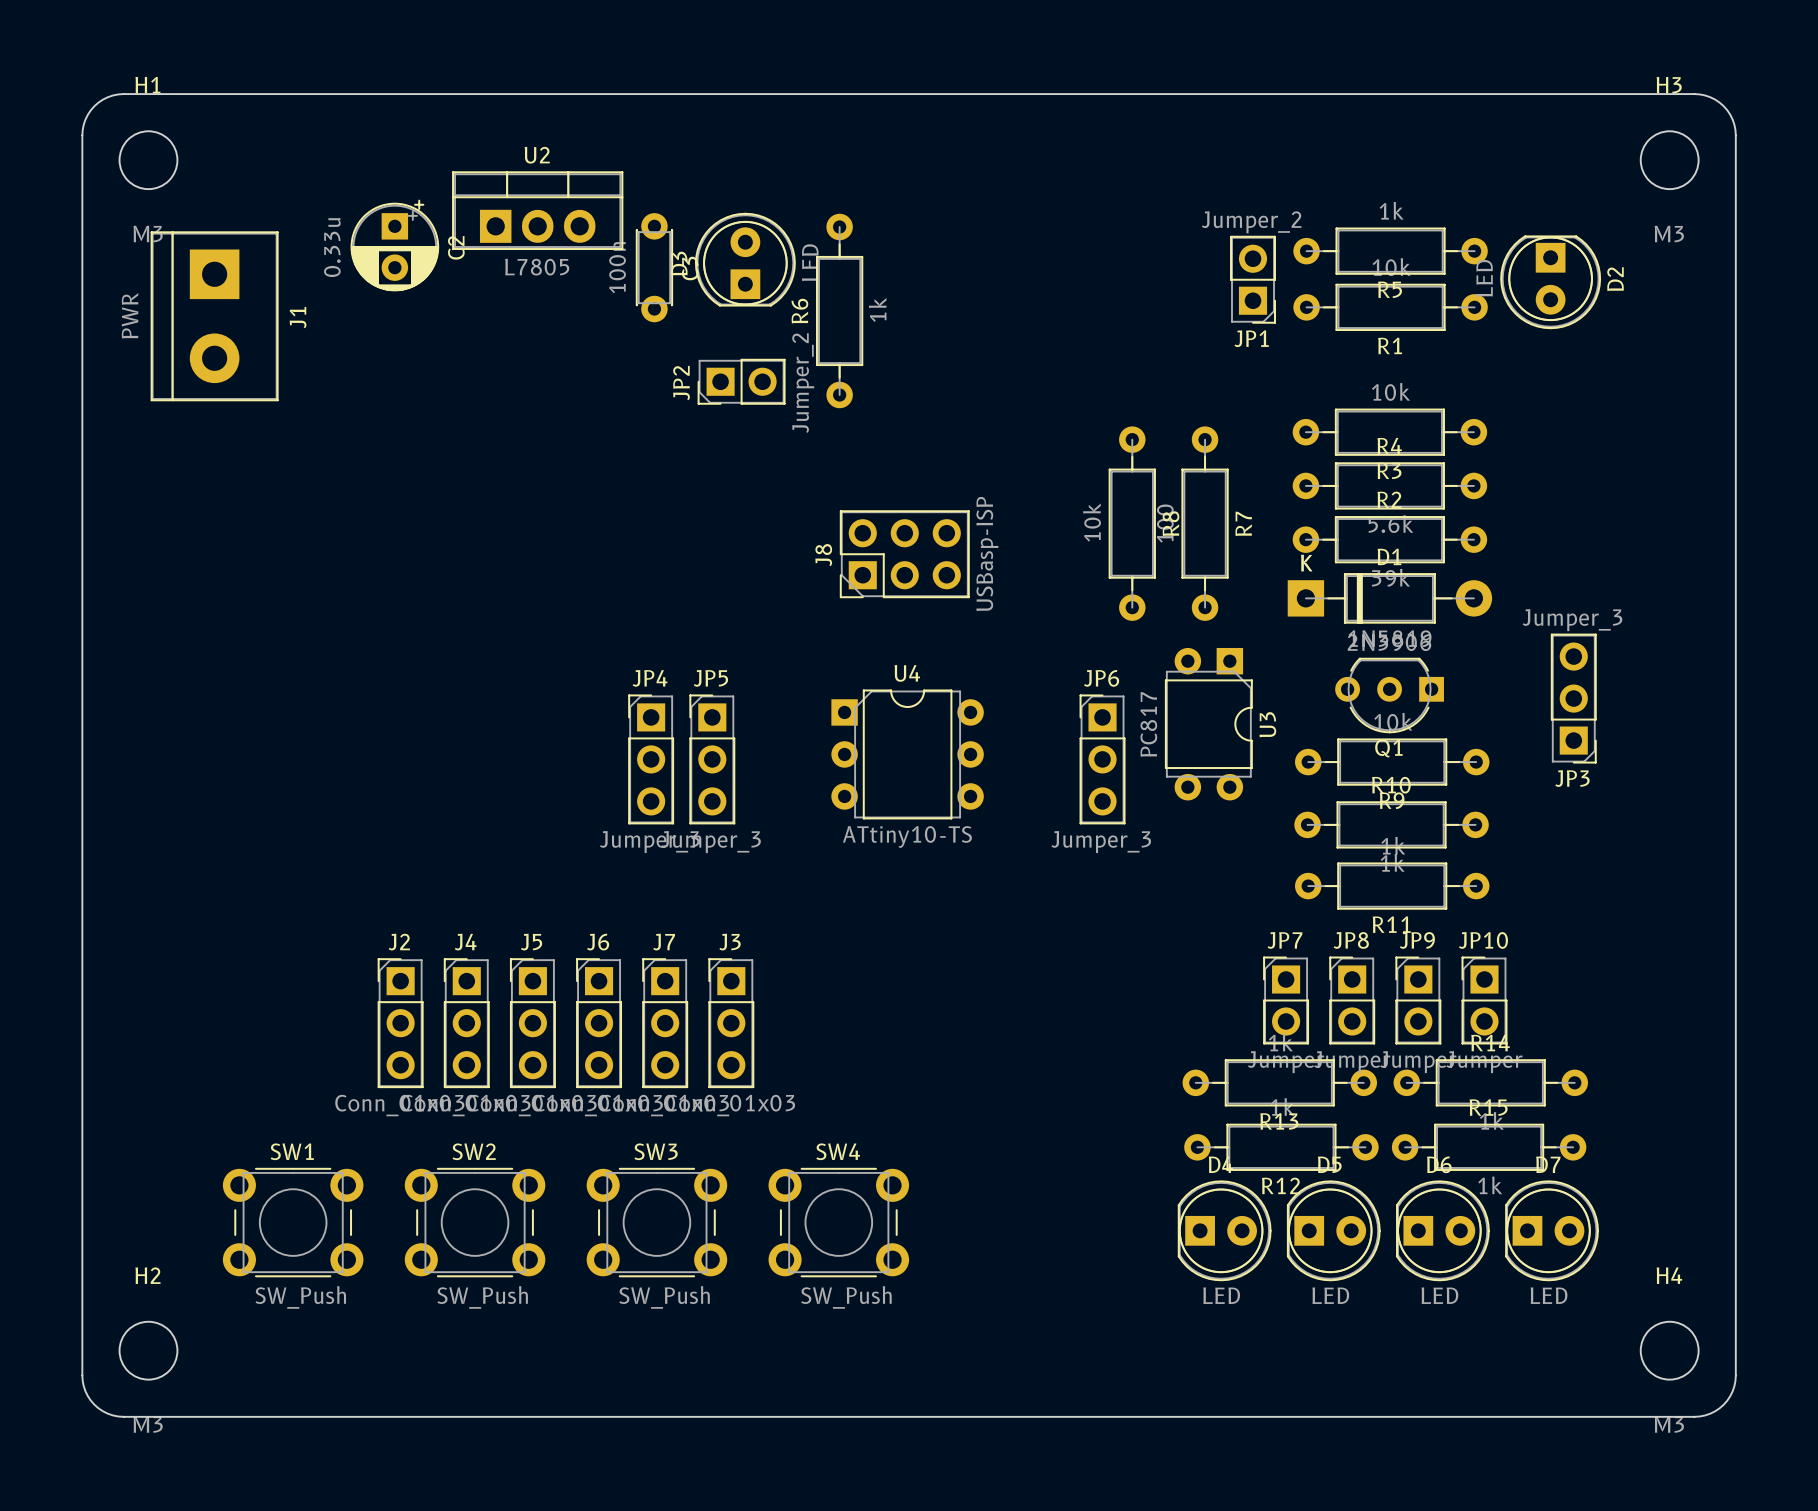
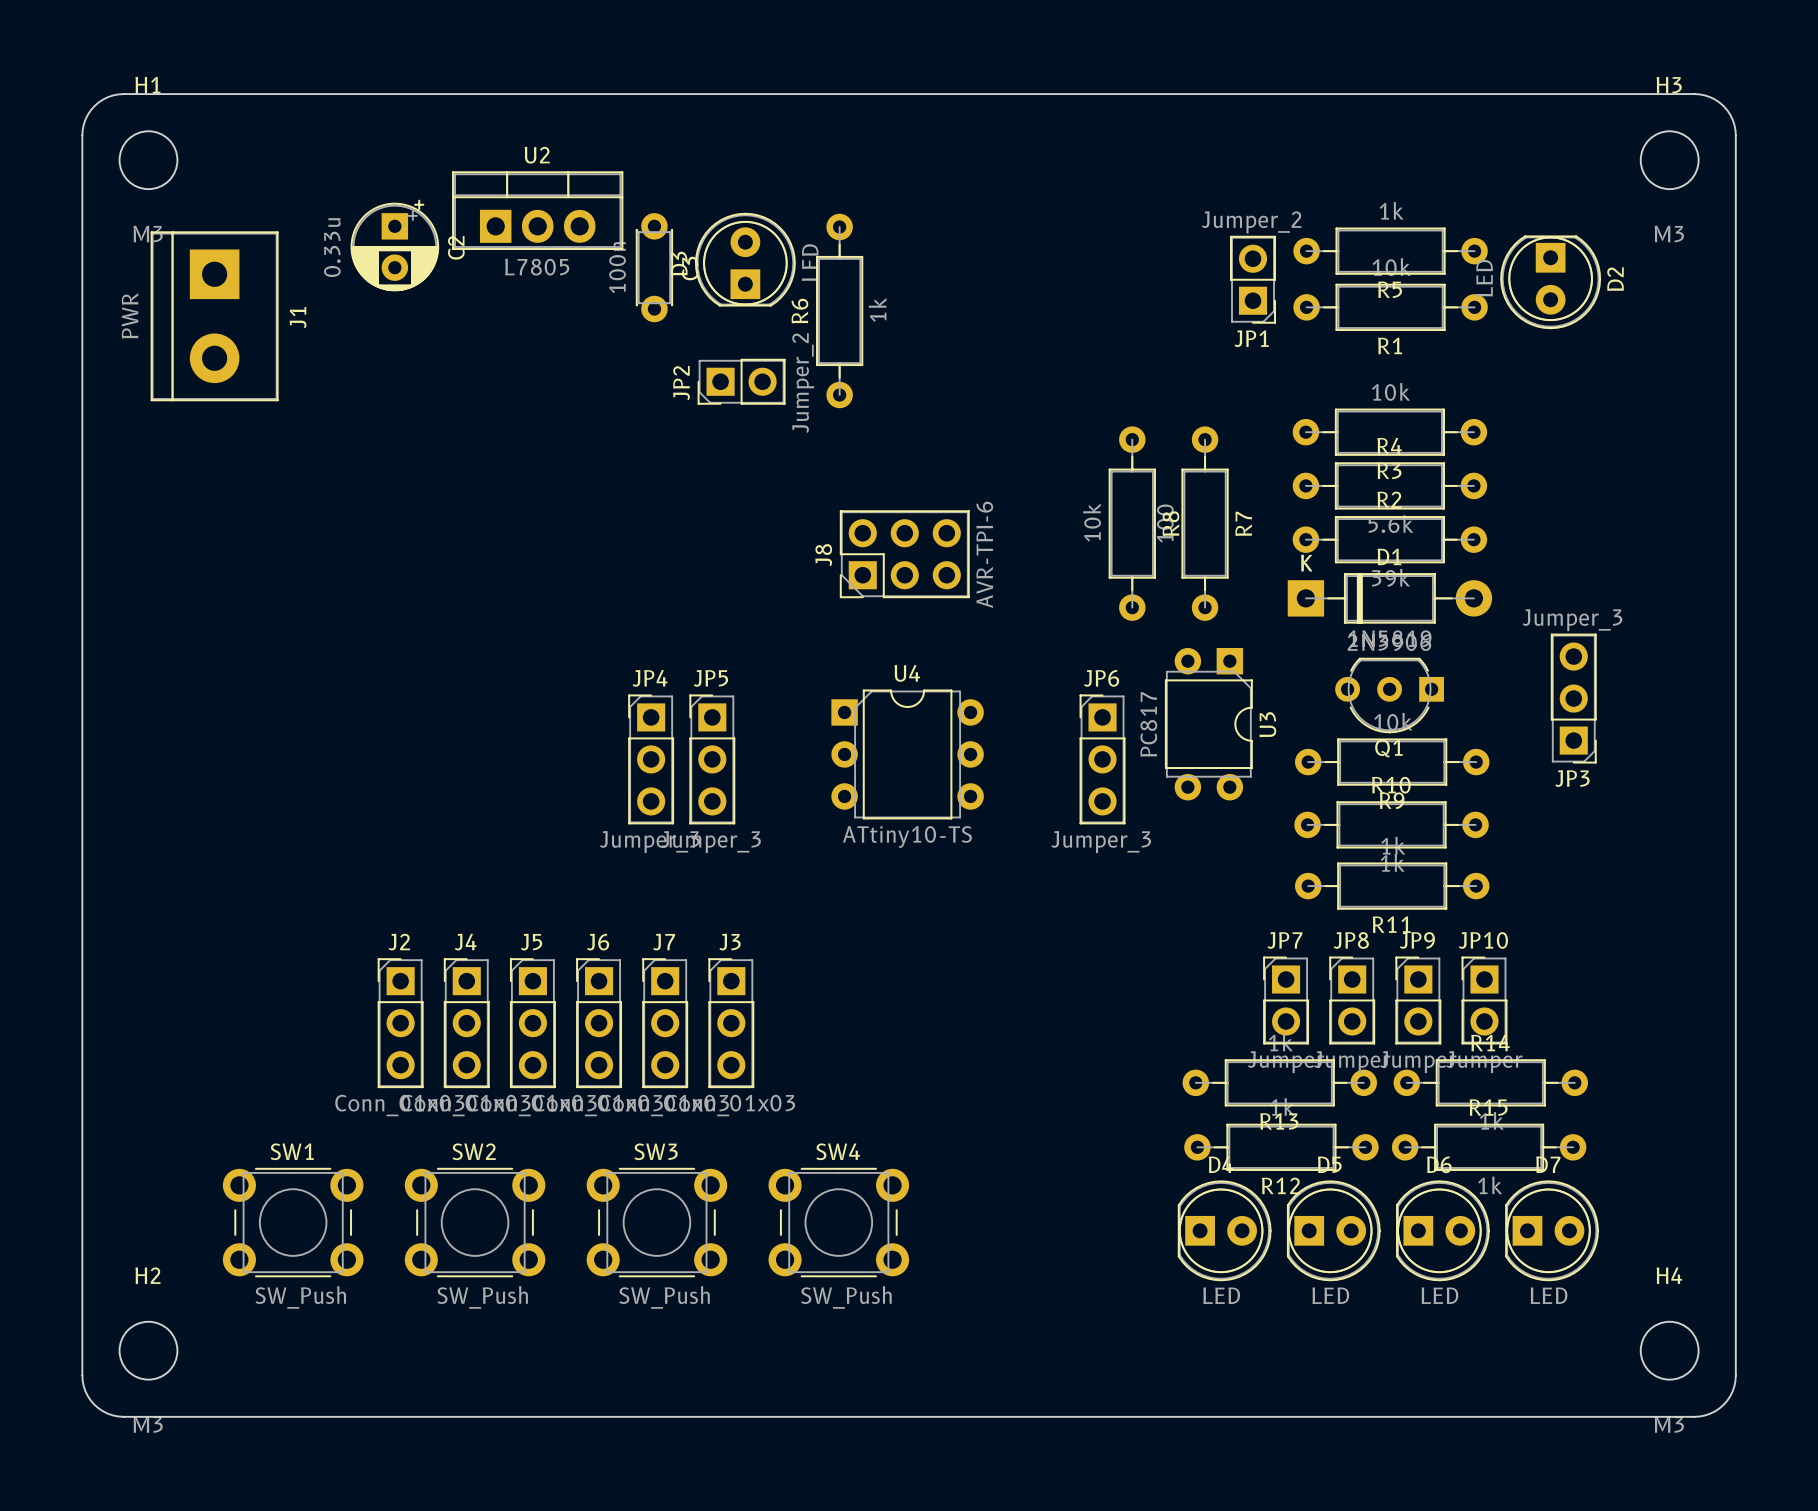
J8 value: USBasp-ISP (987, 554) -> AVR-TPI-6 (984, 554)

